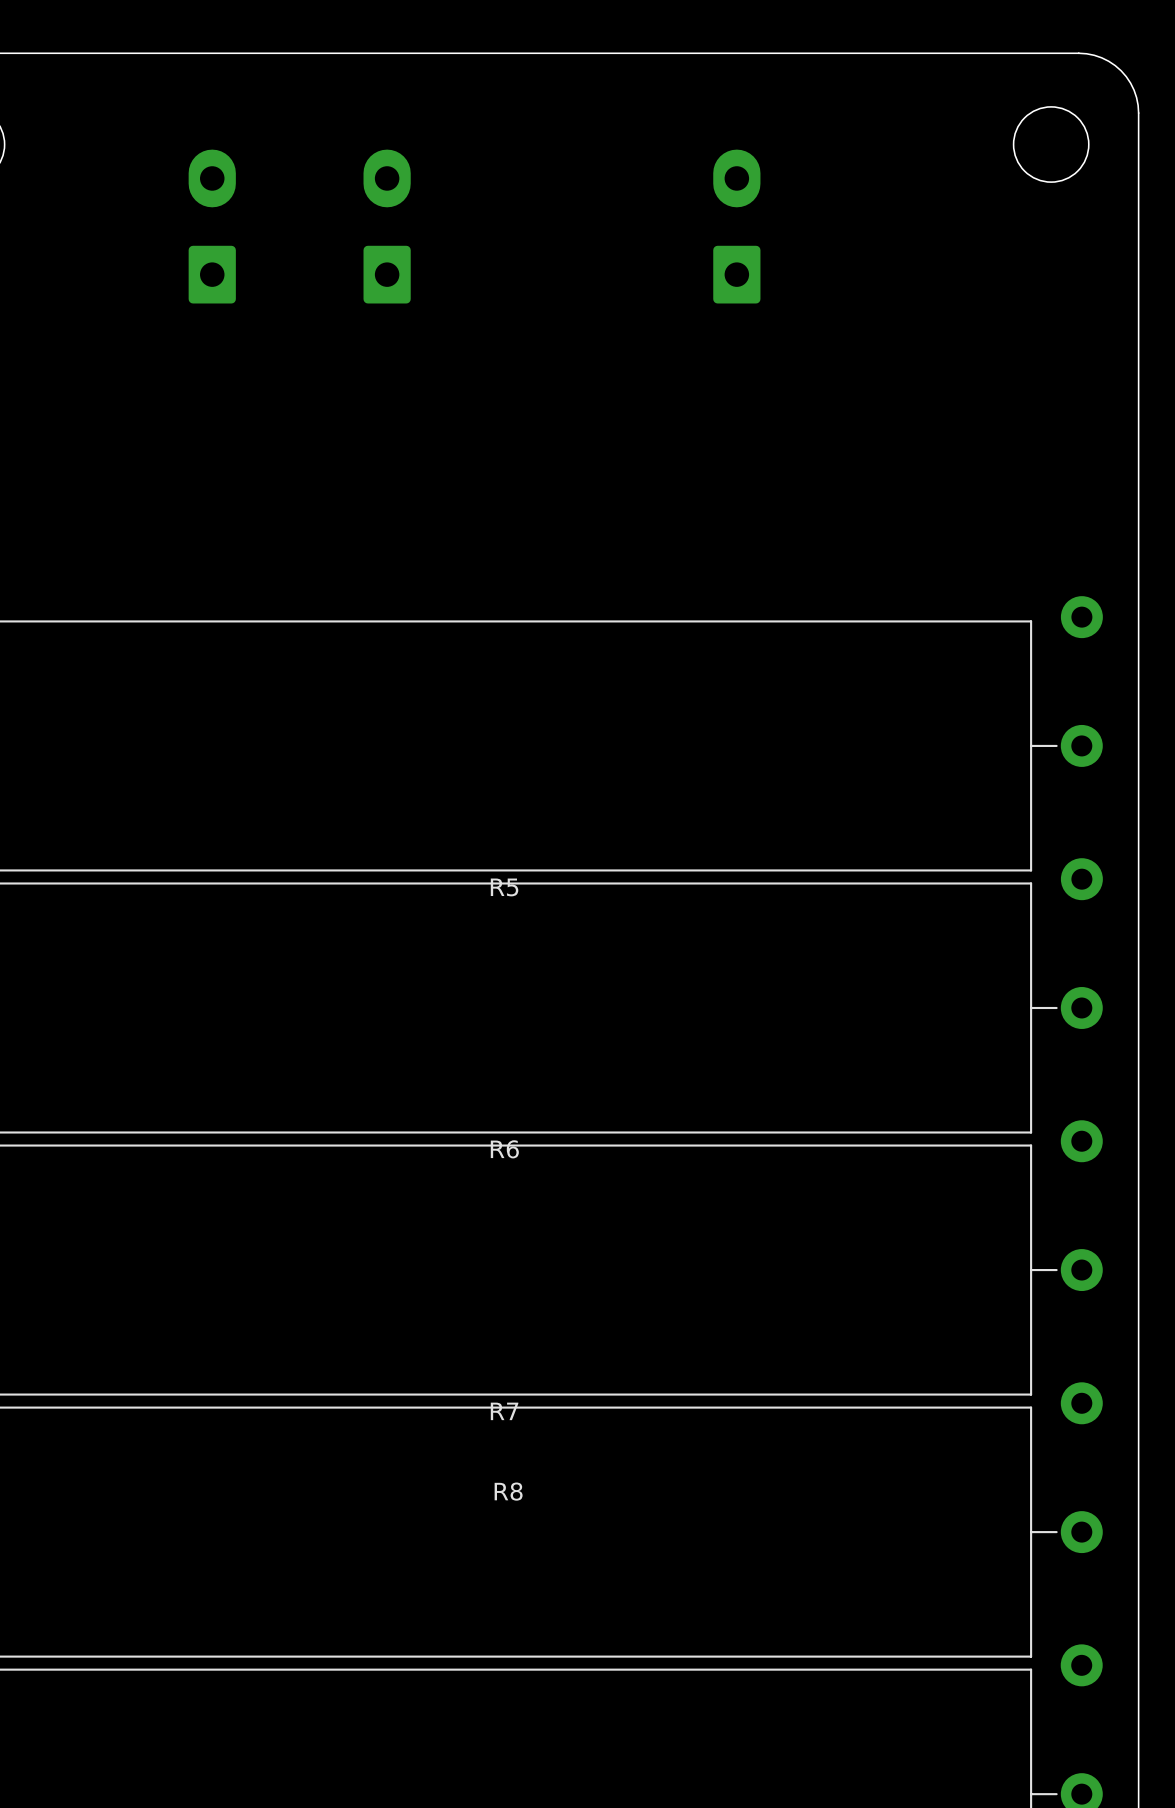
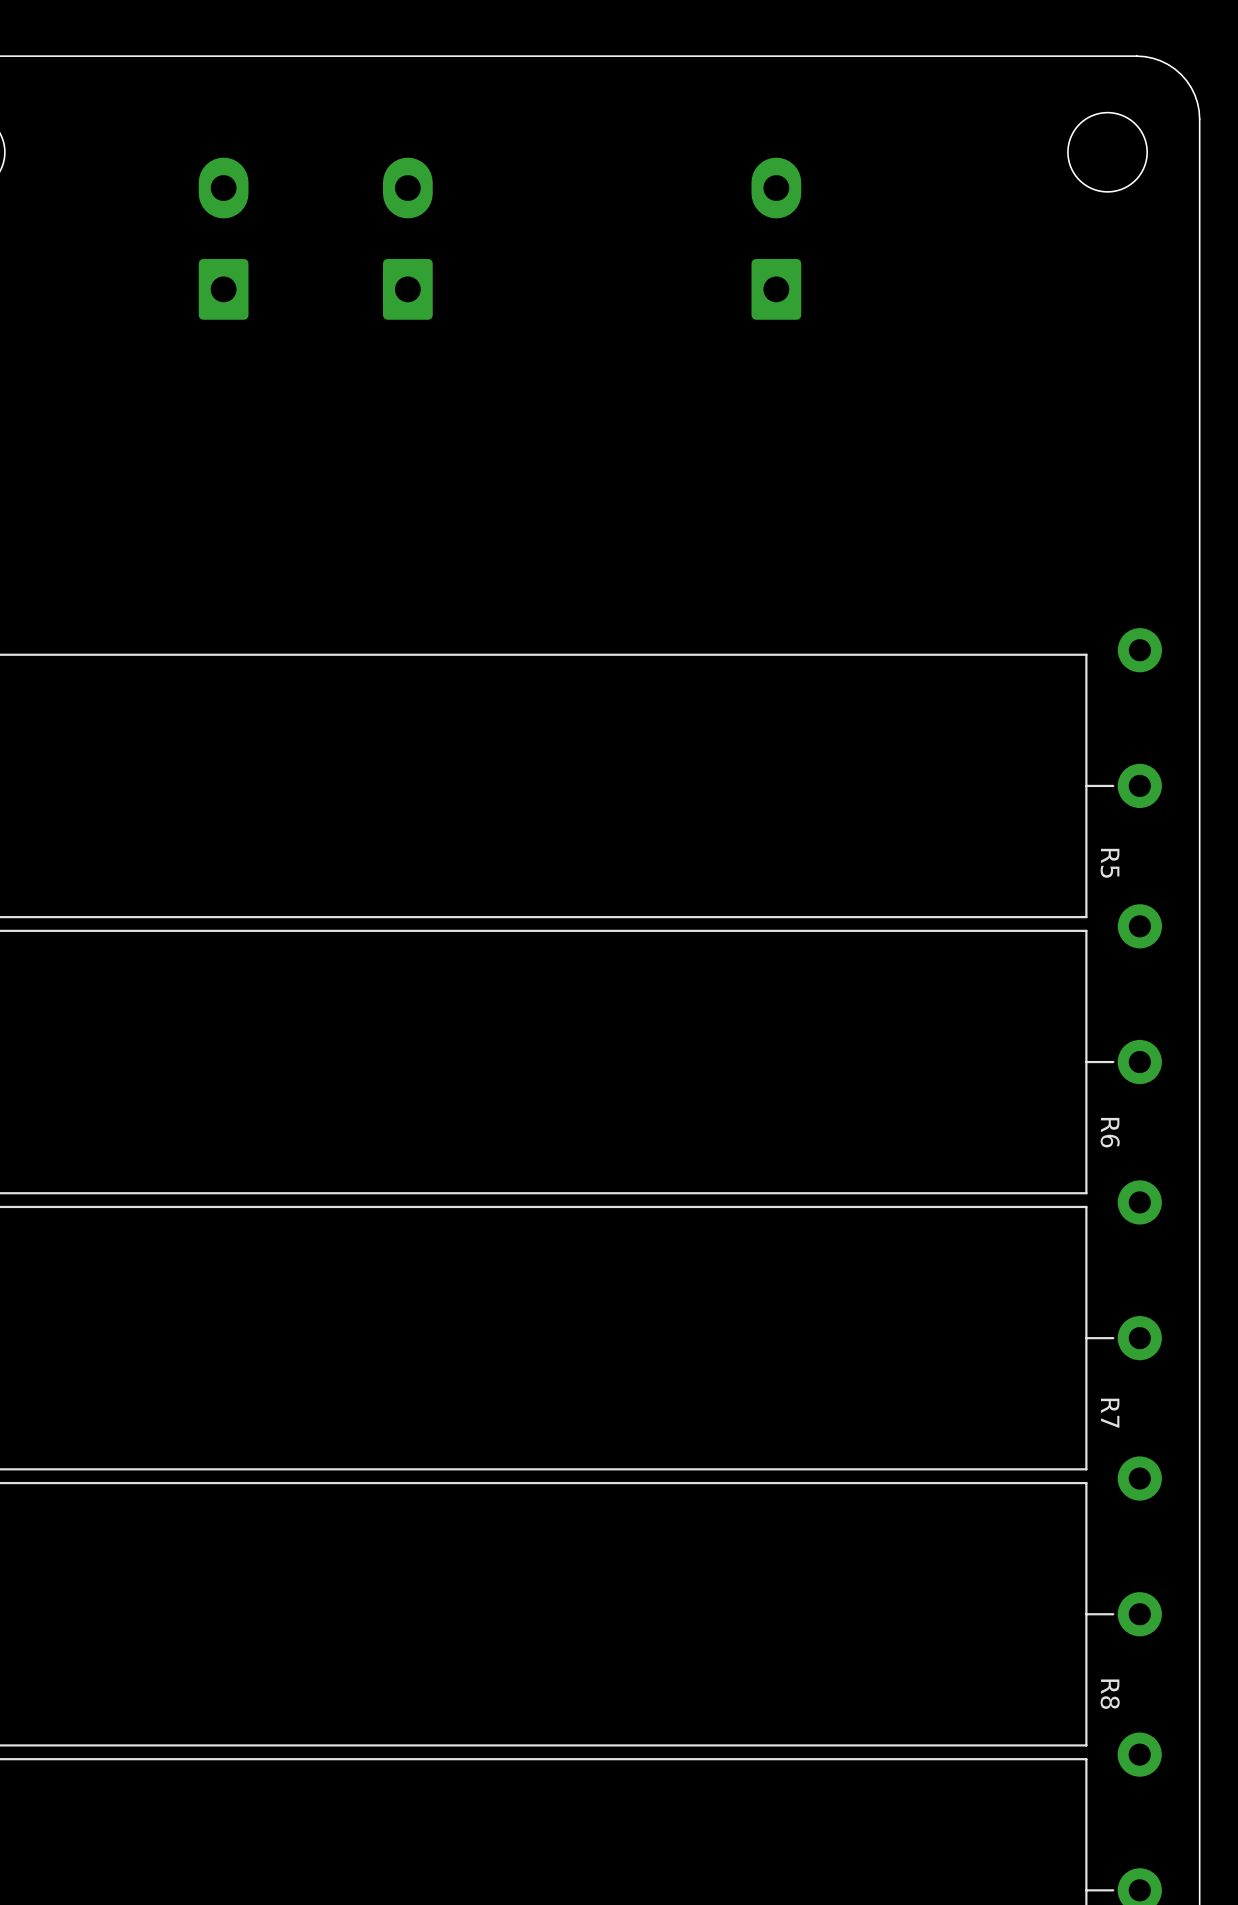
R5 name rotation: 0° (504, 887) -> 90° clockwise (1109, 863)
R5 name position: R5 (504, 887) -> R5 (1109, 863)
R6 name rotation: 0° (504, 1149) -> 90° clockwise (1110, 1132)
R6 name position: R6 (504, 1149) -> R6 (1110, 1132)
R7 name rotation: 0° (504, 1411) -> 90° clockwise (1110, 1413)
R7 name position: R7 (504, 1411) -> R7 (1110, 1413)
R8 name rotation: 0° (508, 1491) -> 90° clockwise (1110, 1694)
R8 name position: R8 (508, 1491) -> R8 (1110, 1694)

